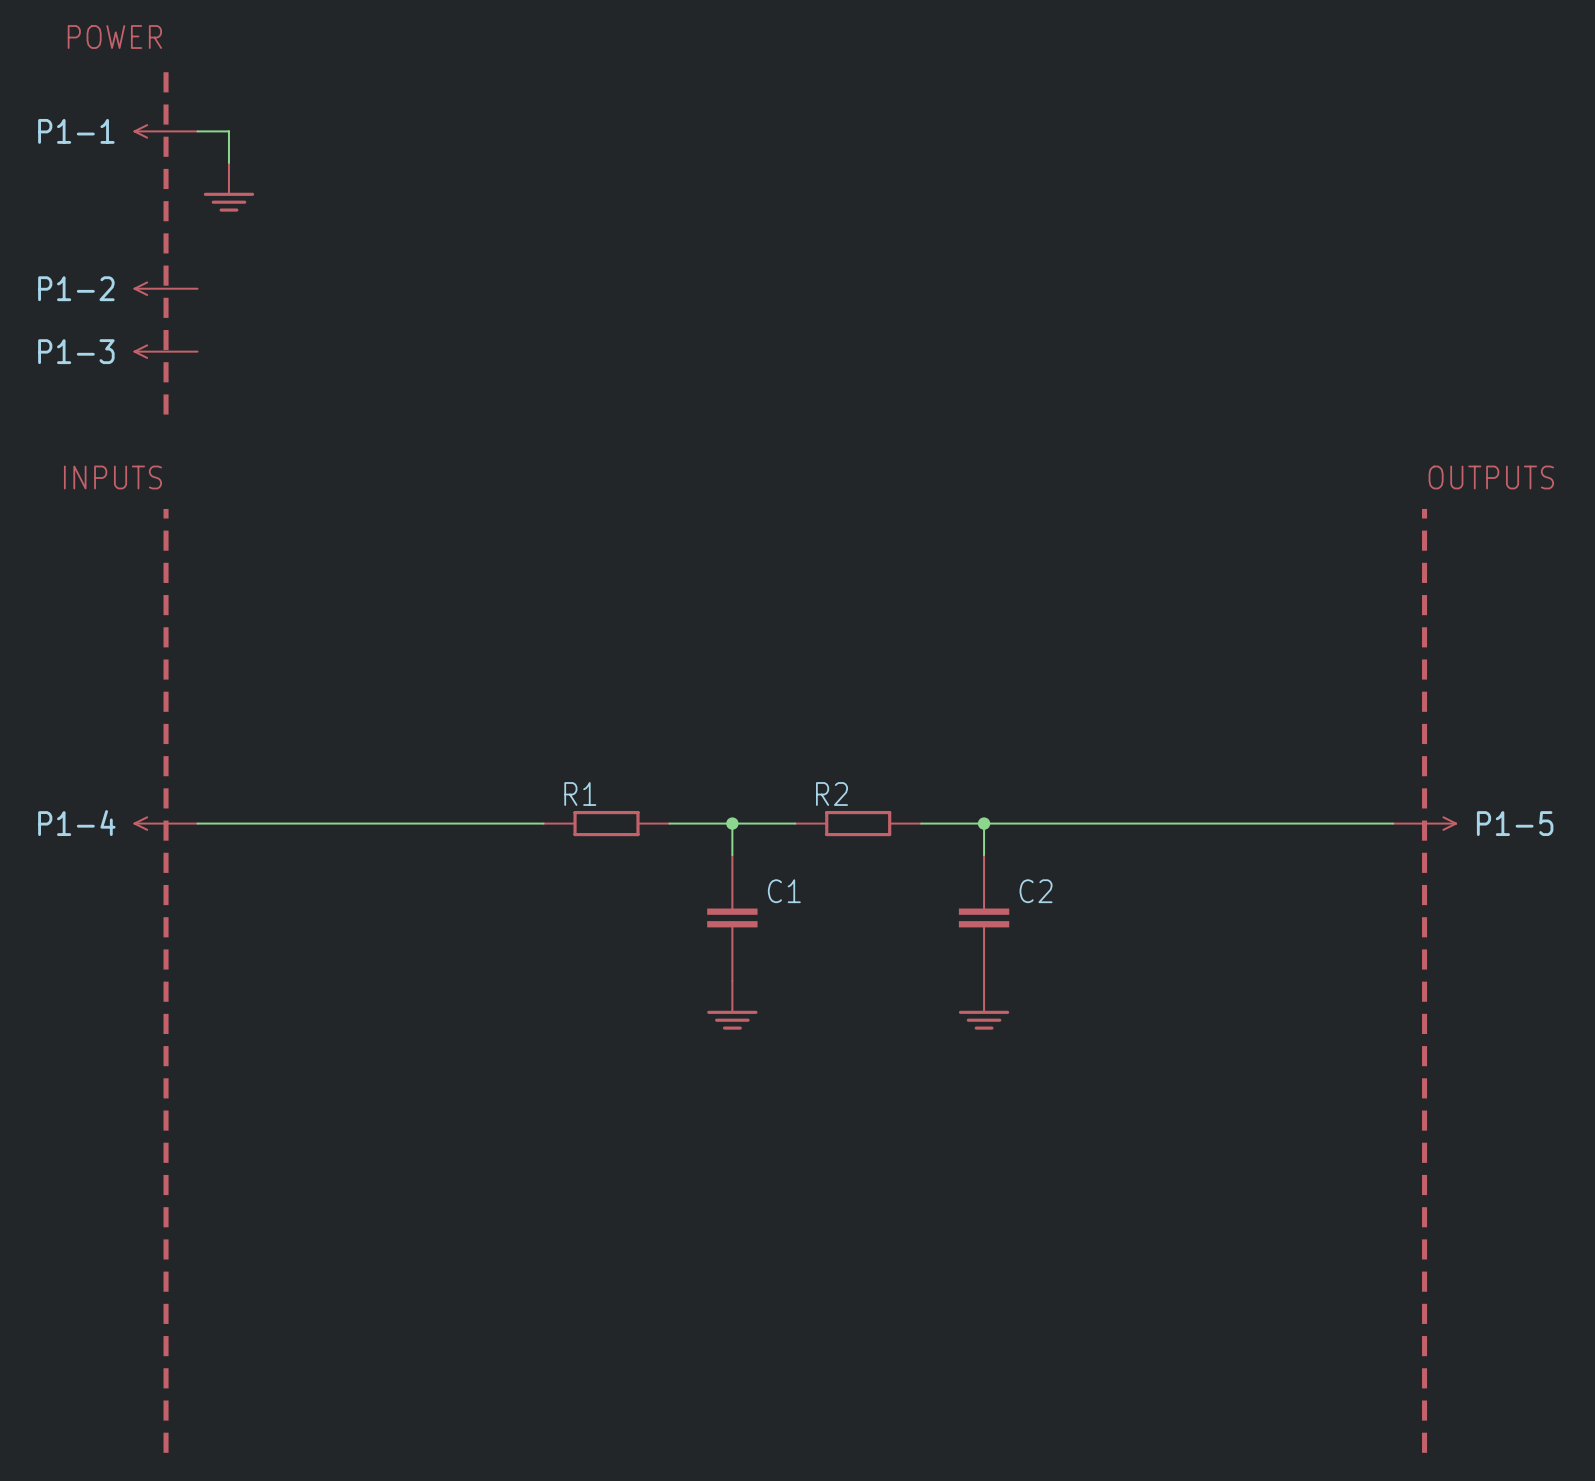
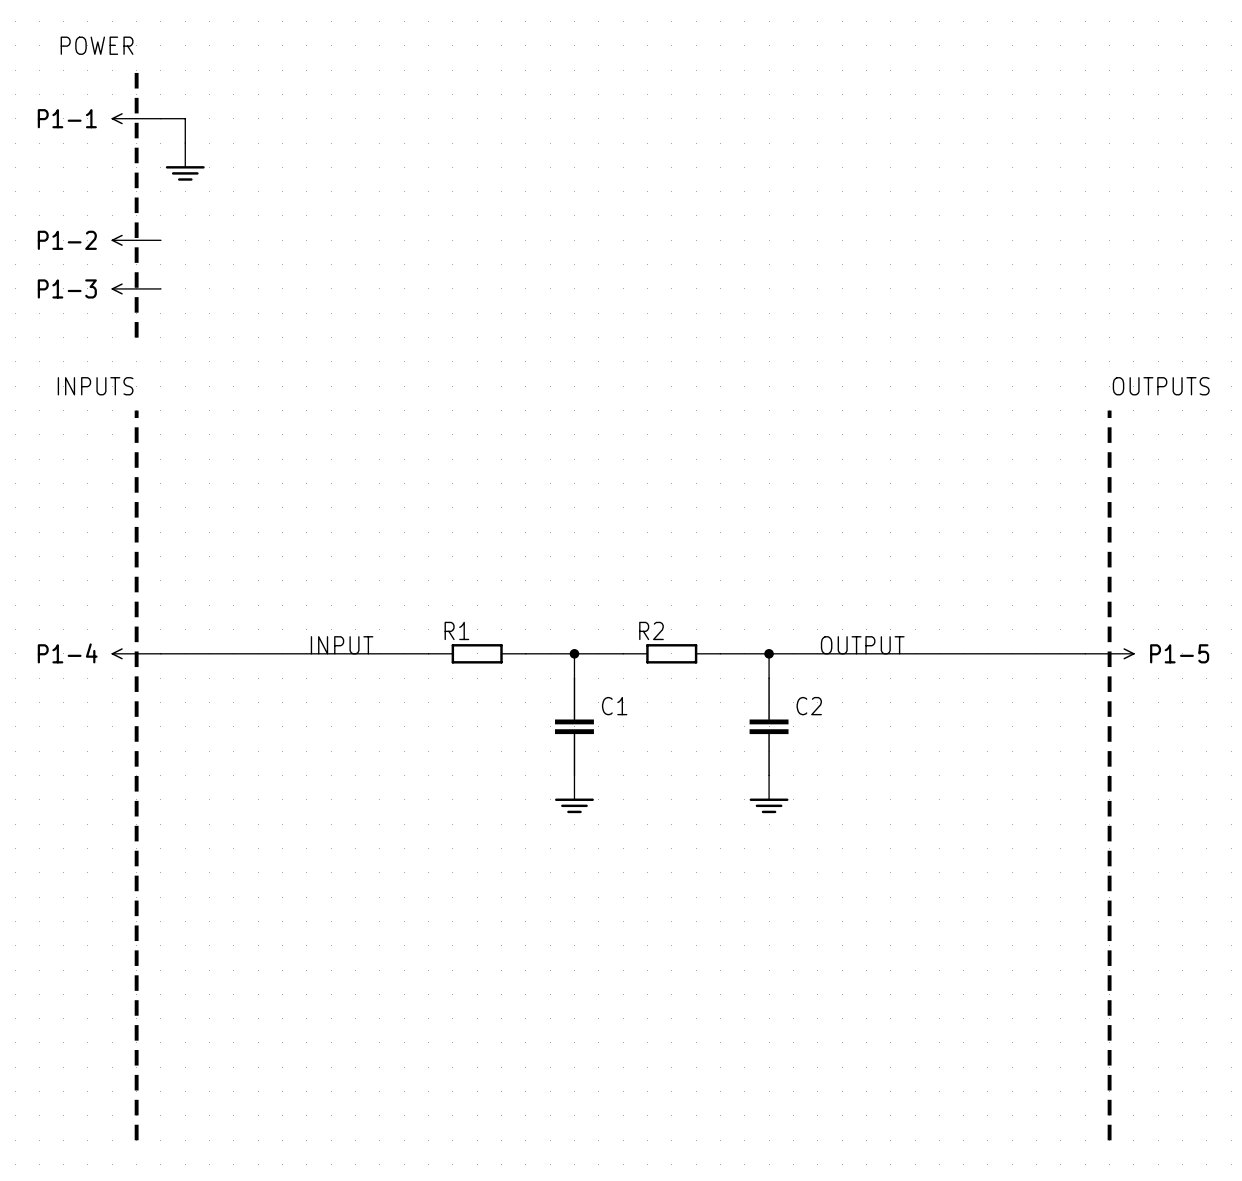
label: none -> INPUT (342, 645)
label: none -> OUTPUT (862, 645)

